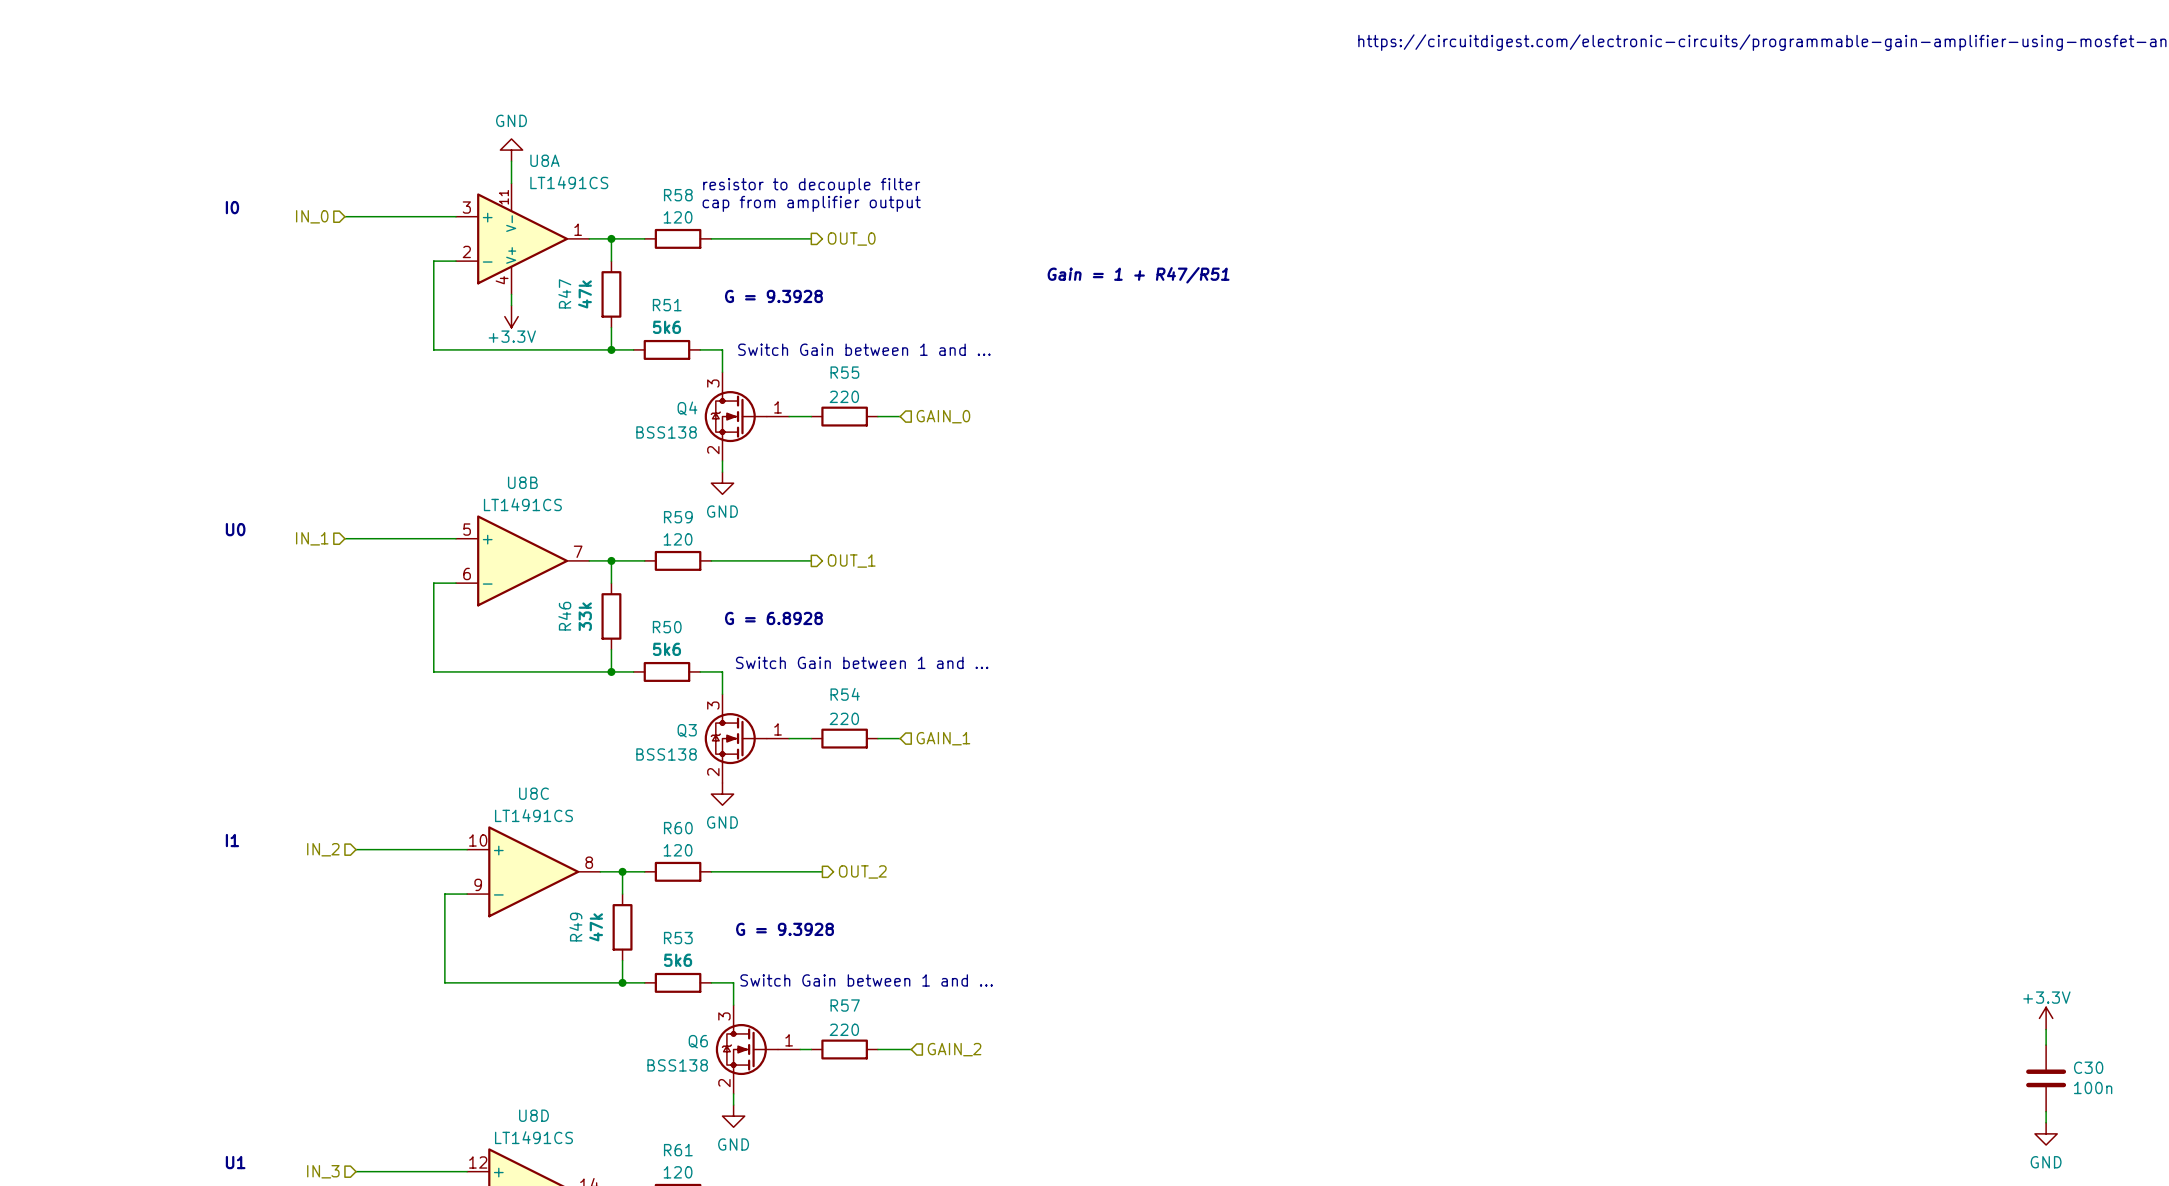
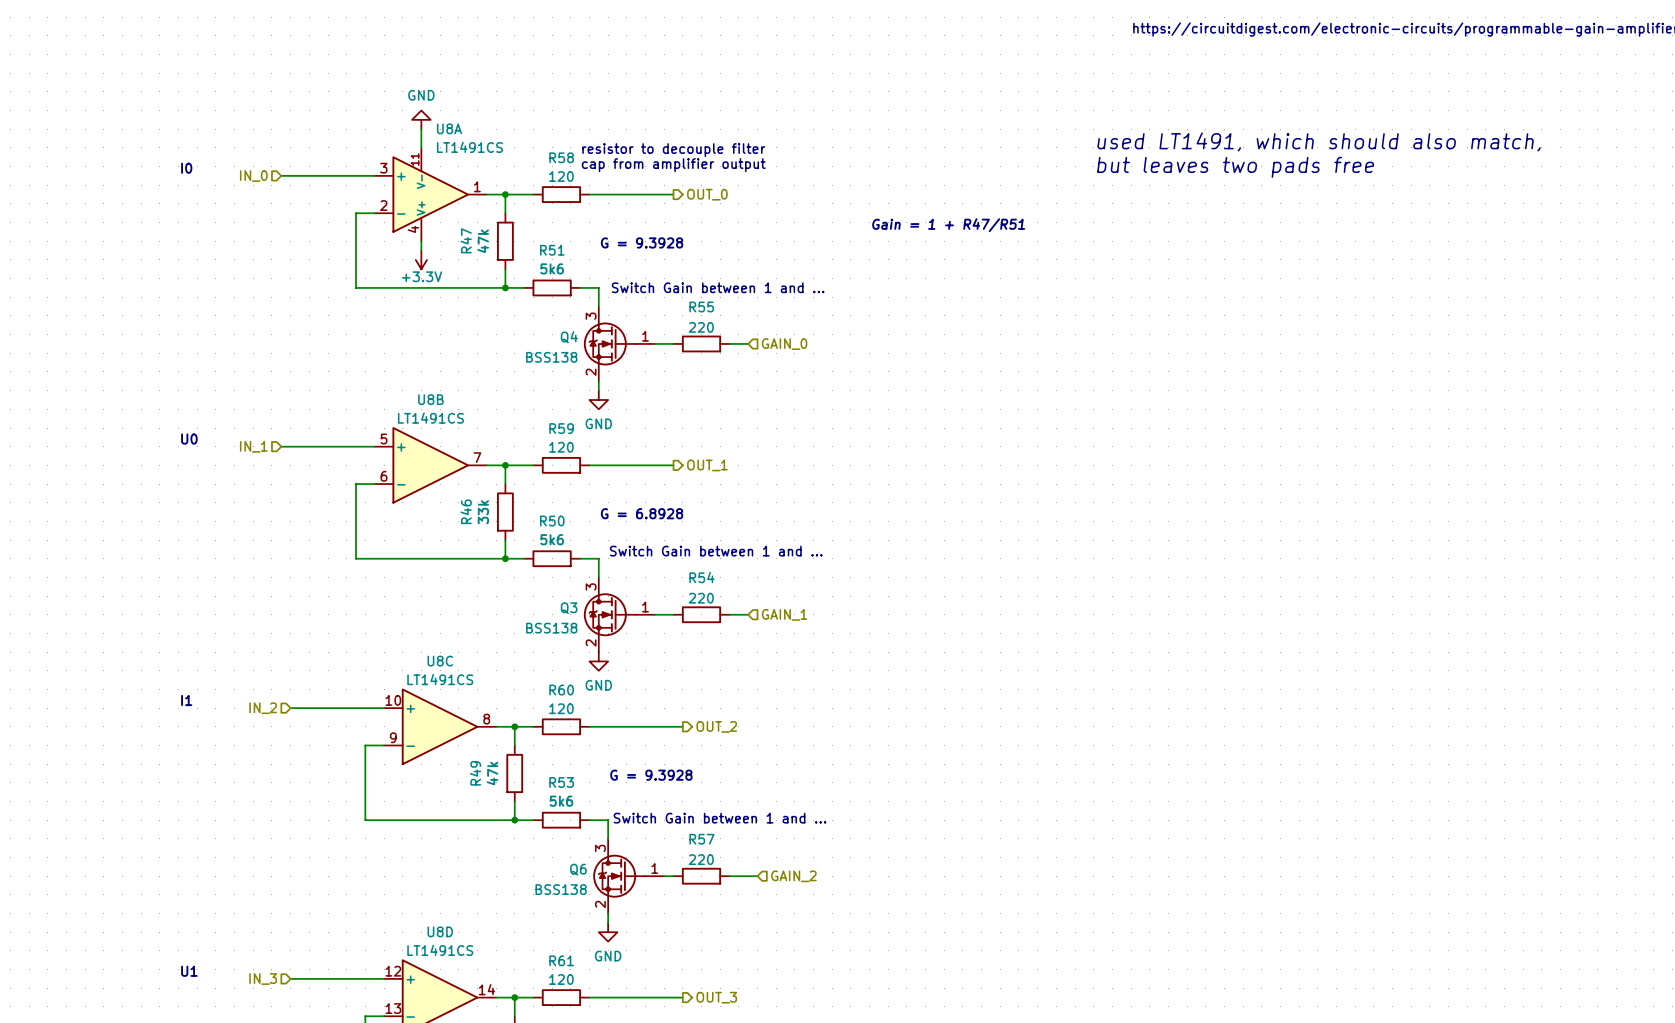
text: none -> used LT1491, which should also match, (1319, 141)
text: none -> but leaves two pads free (1235, 167)

